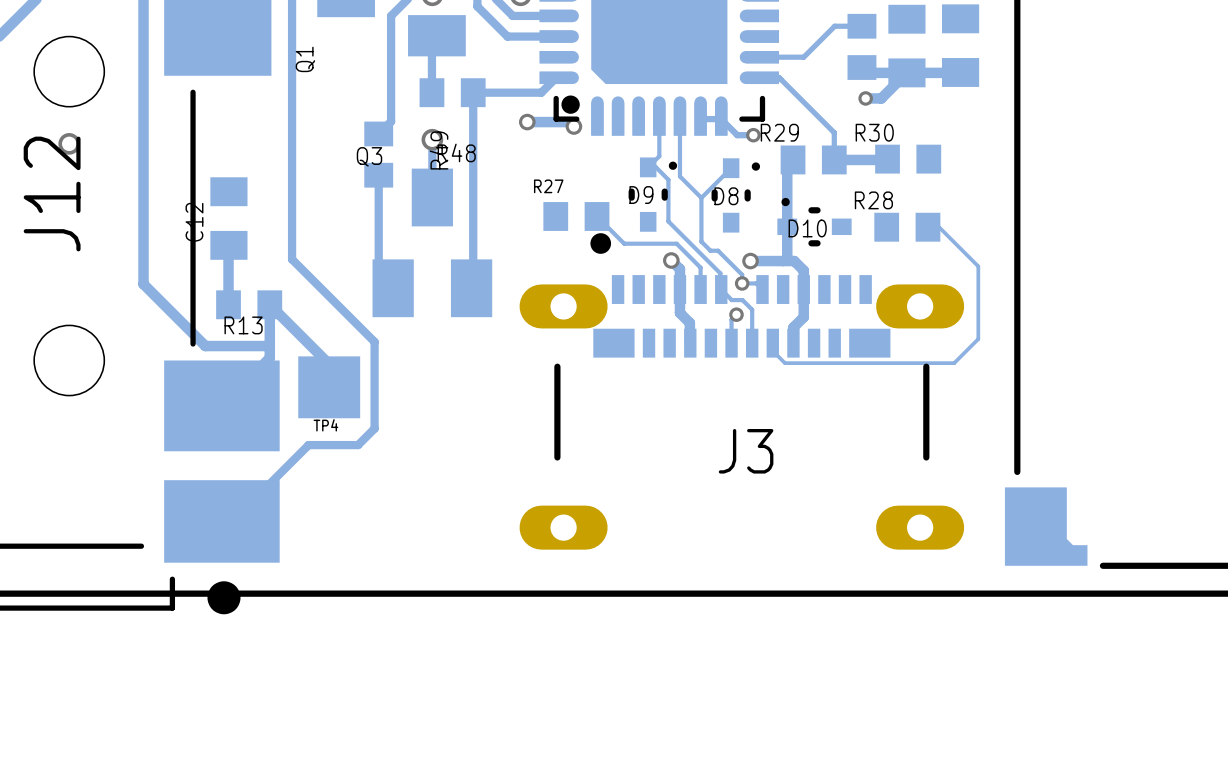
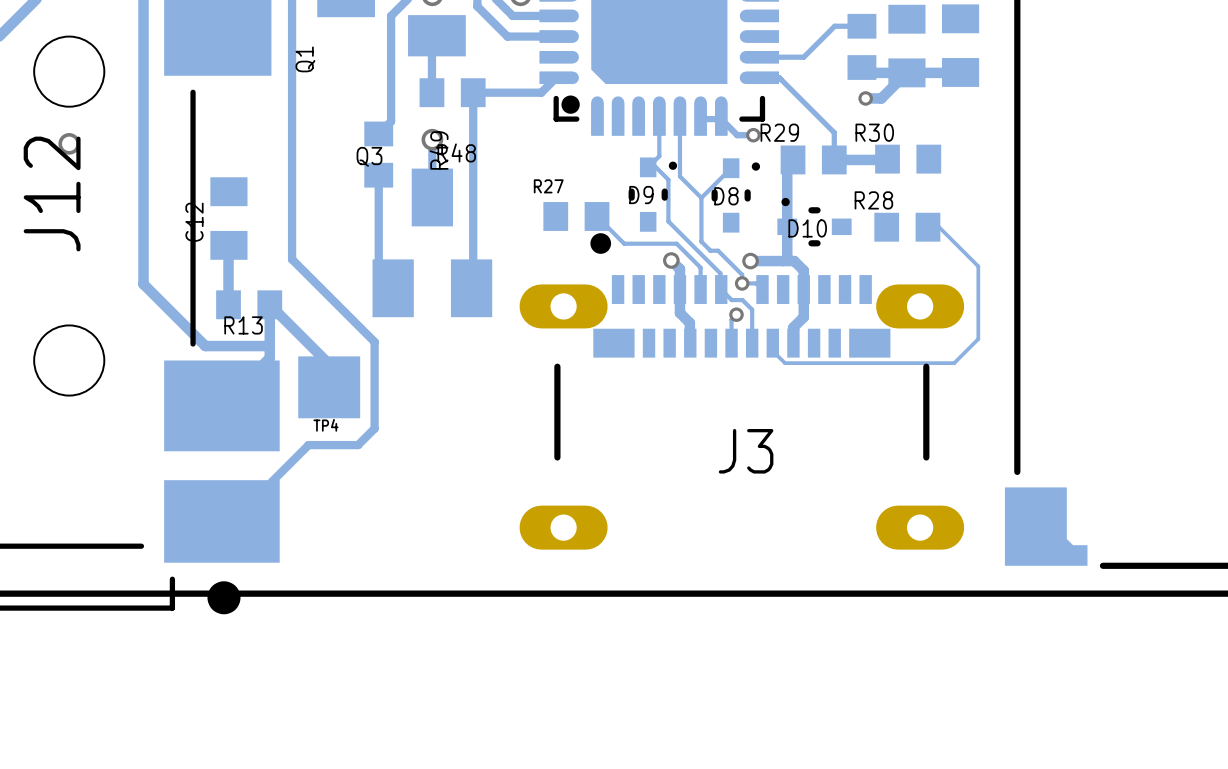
track: (527, 122) (569, 122) (573, 126) -> none
via: (527, 122) -> none
via: (573, 126) -> none

